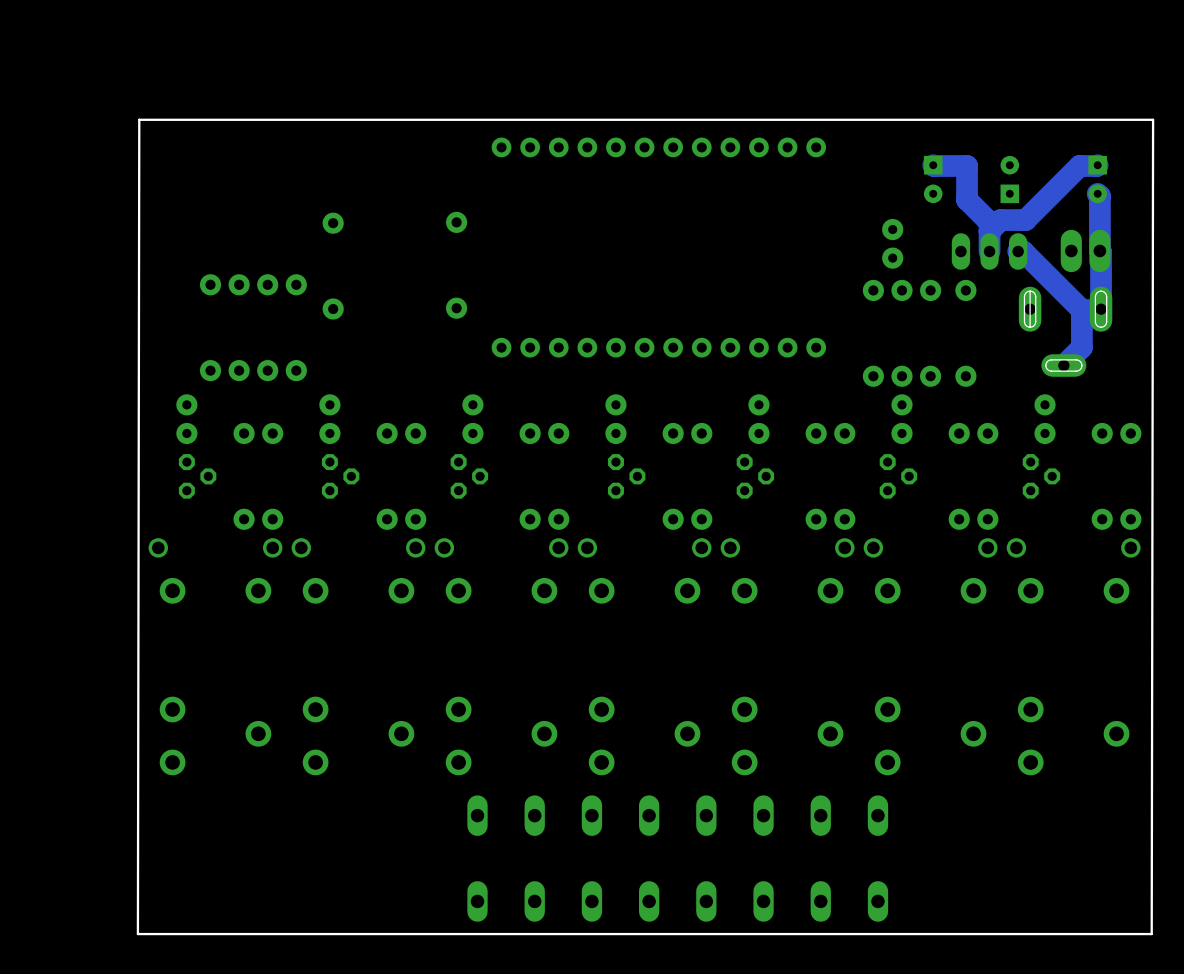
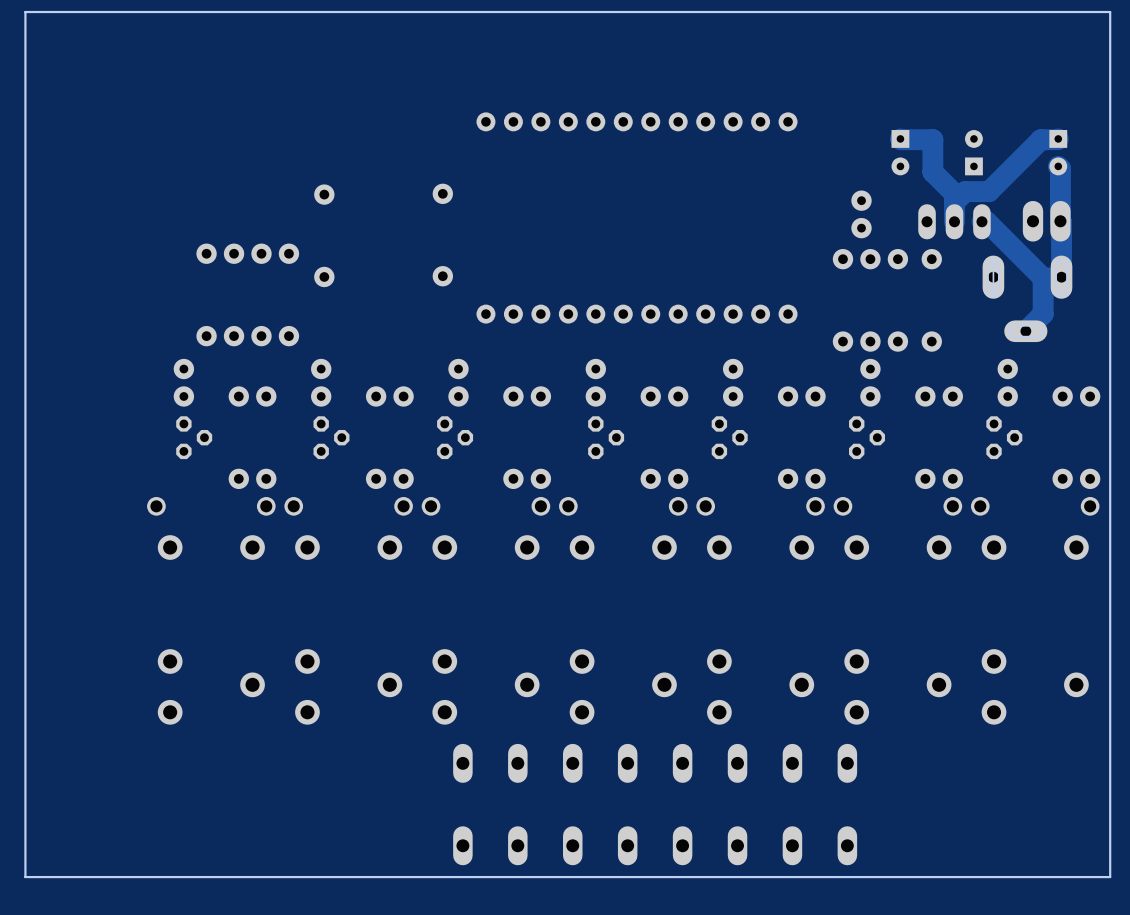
board edge: (1151, 934) (1153, 119) (139, 119) (137, 934) -> (1110, 877) (1110, 12) (25, 12) (25, 877) (136, 877)

